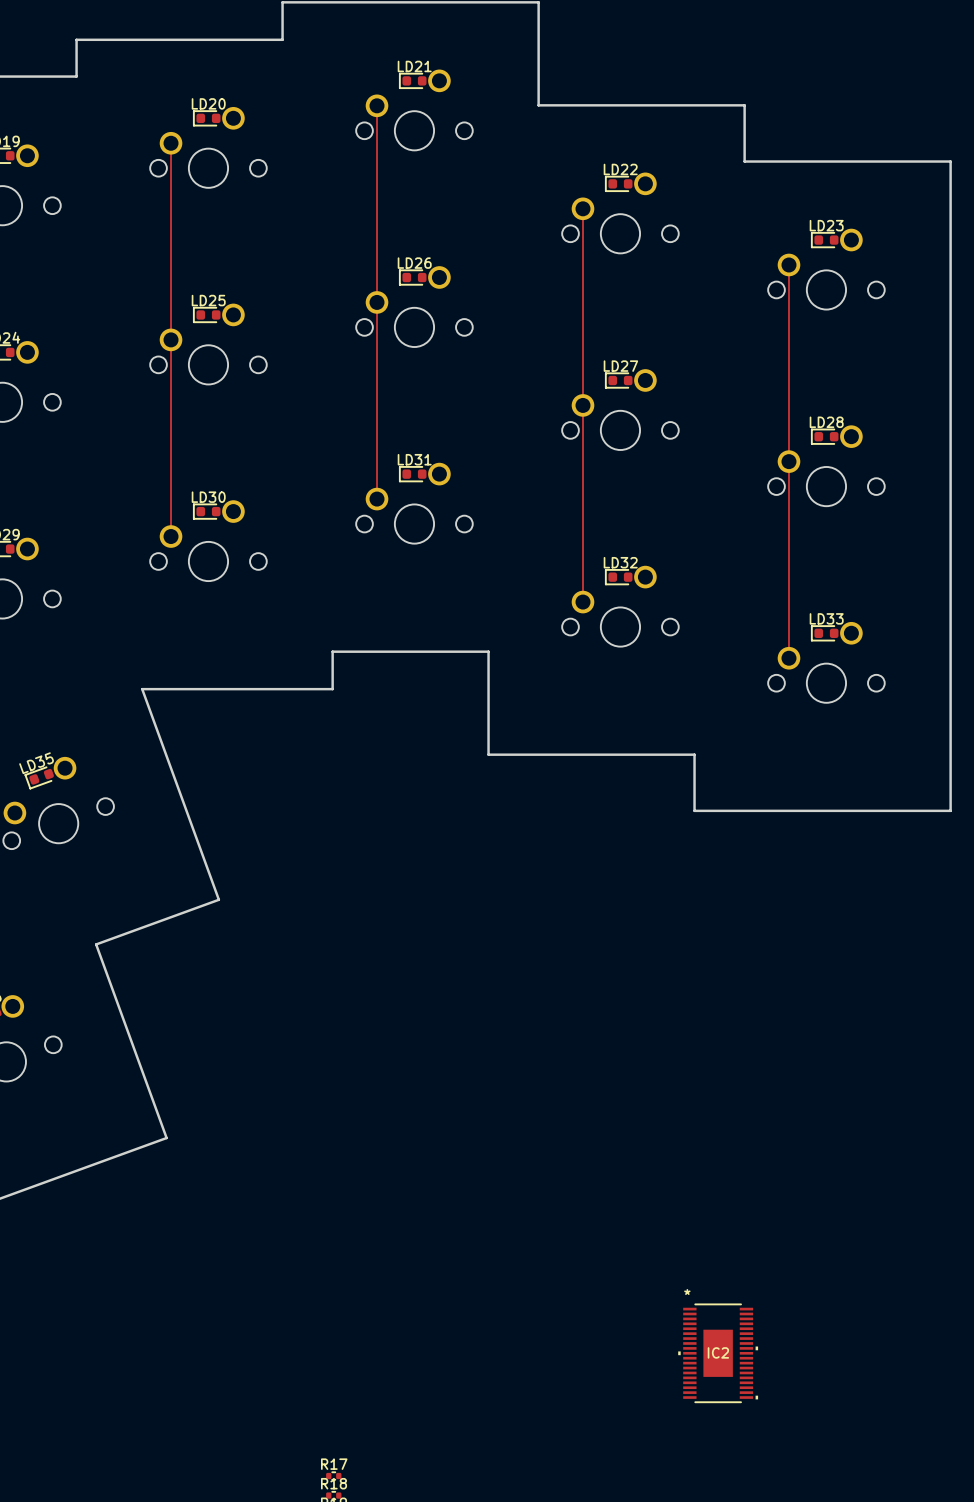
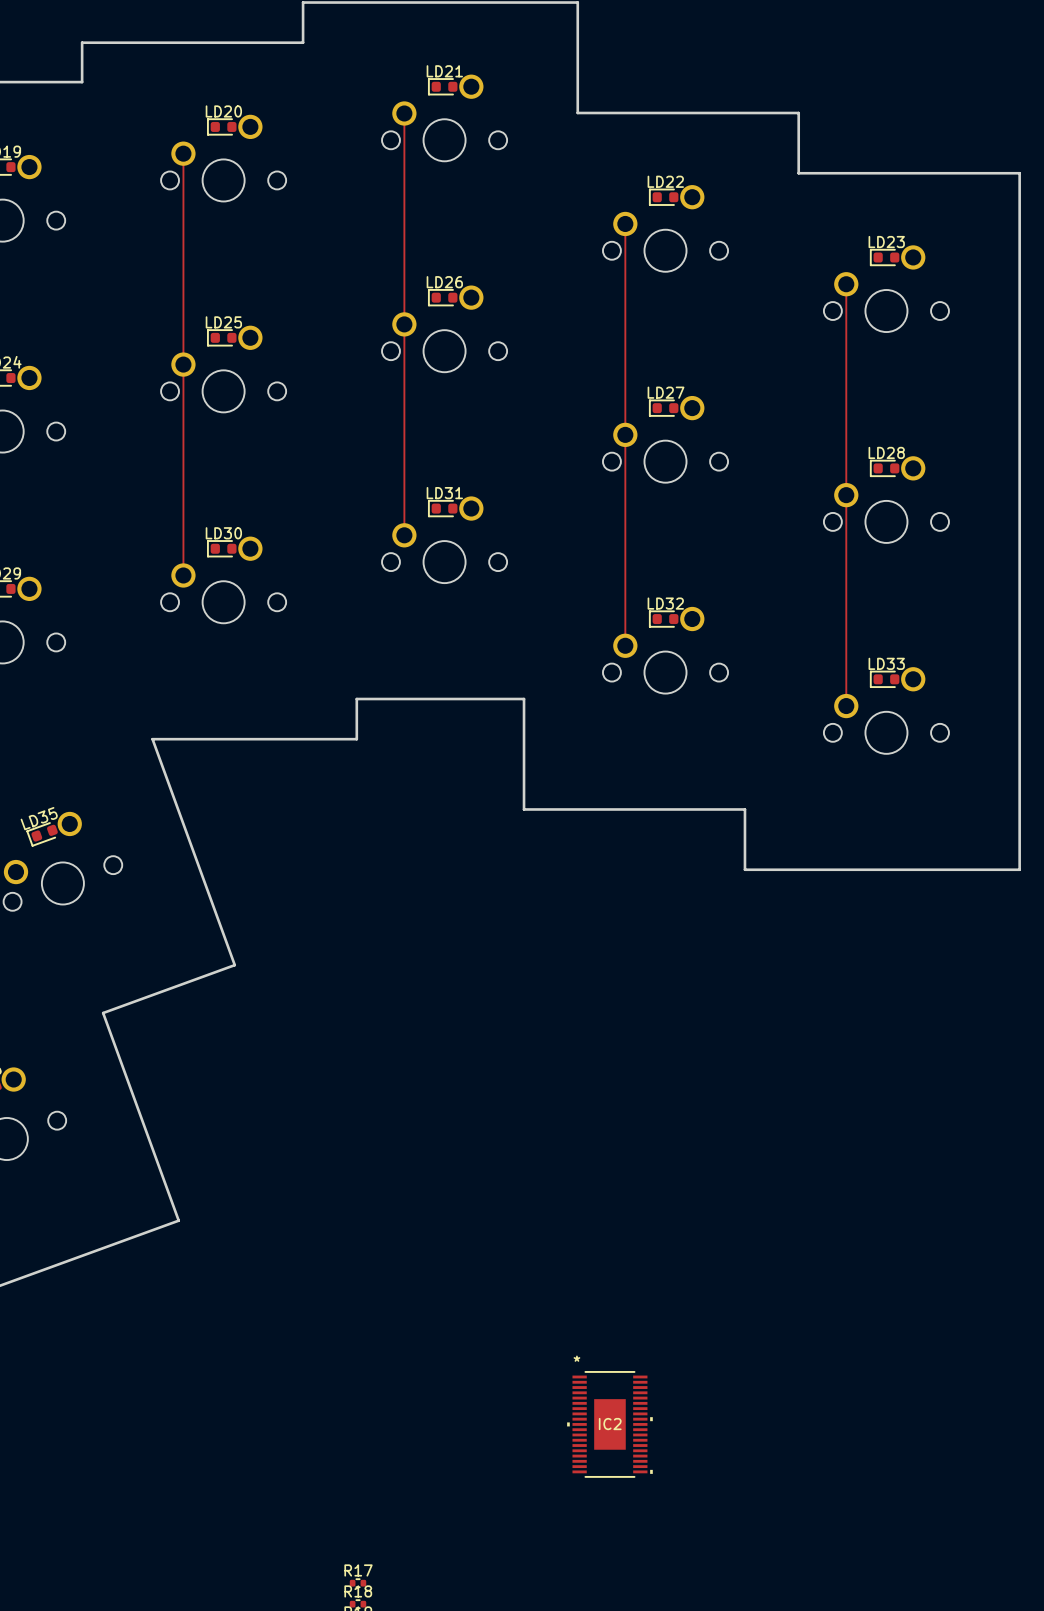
IC2 position: (718, 1353) -> (609, 1424)

